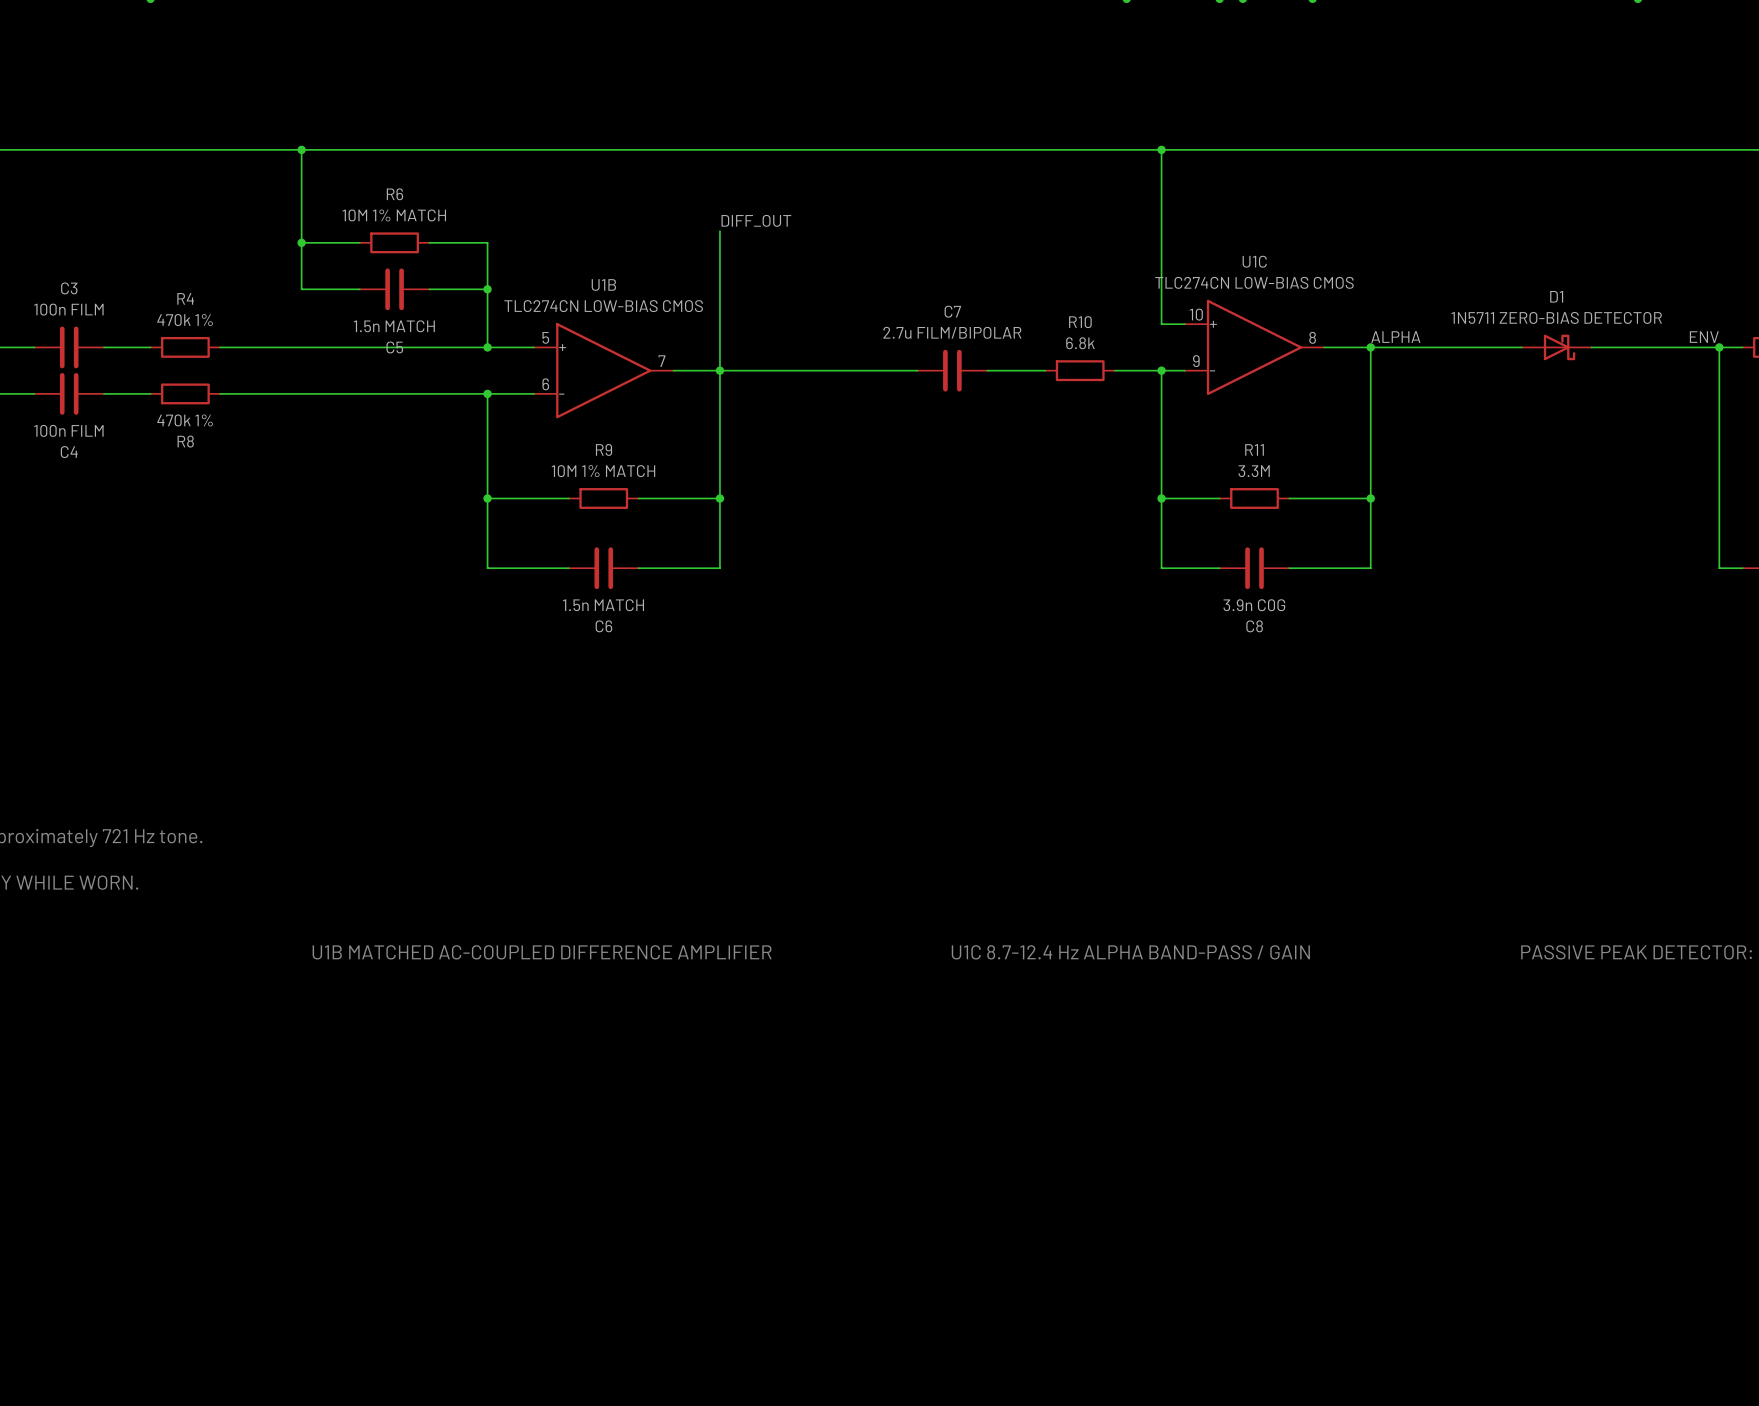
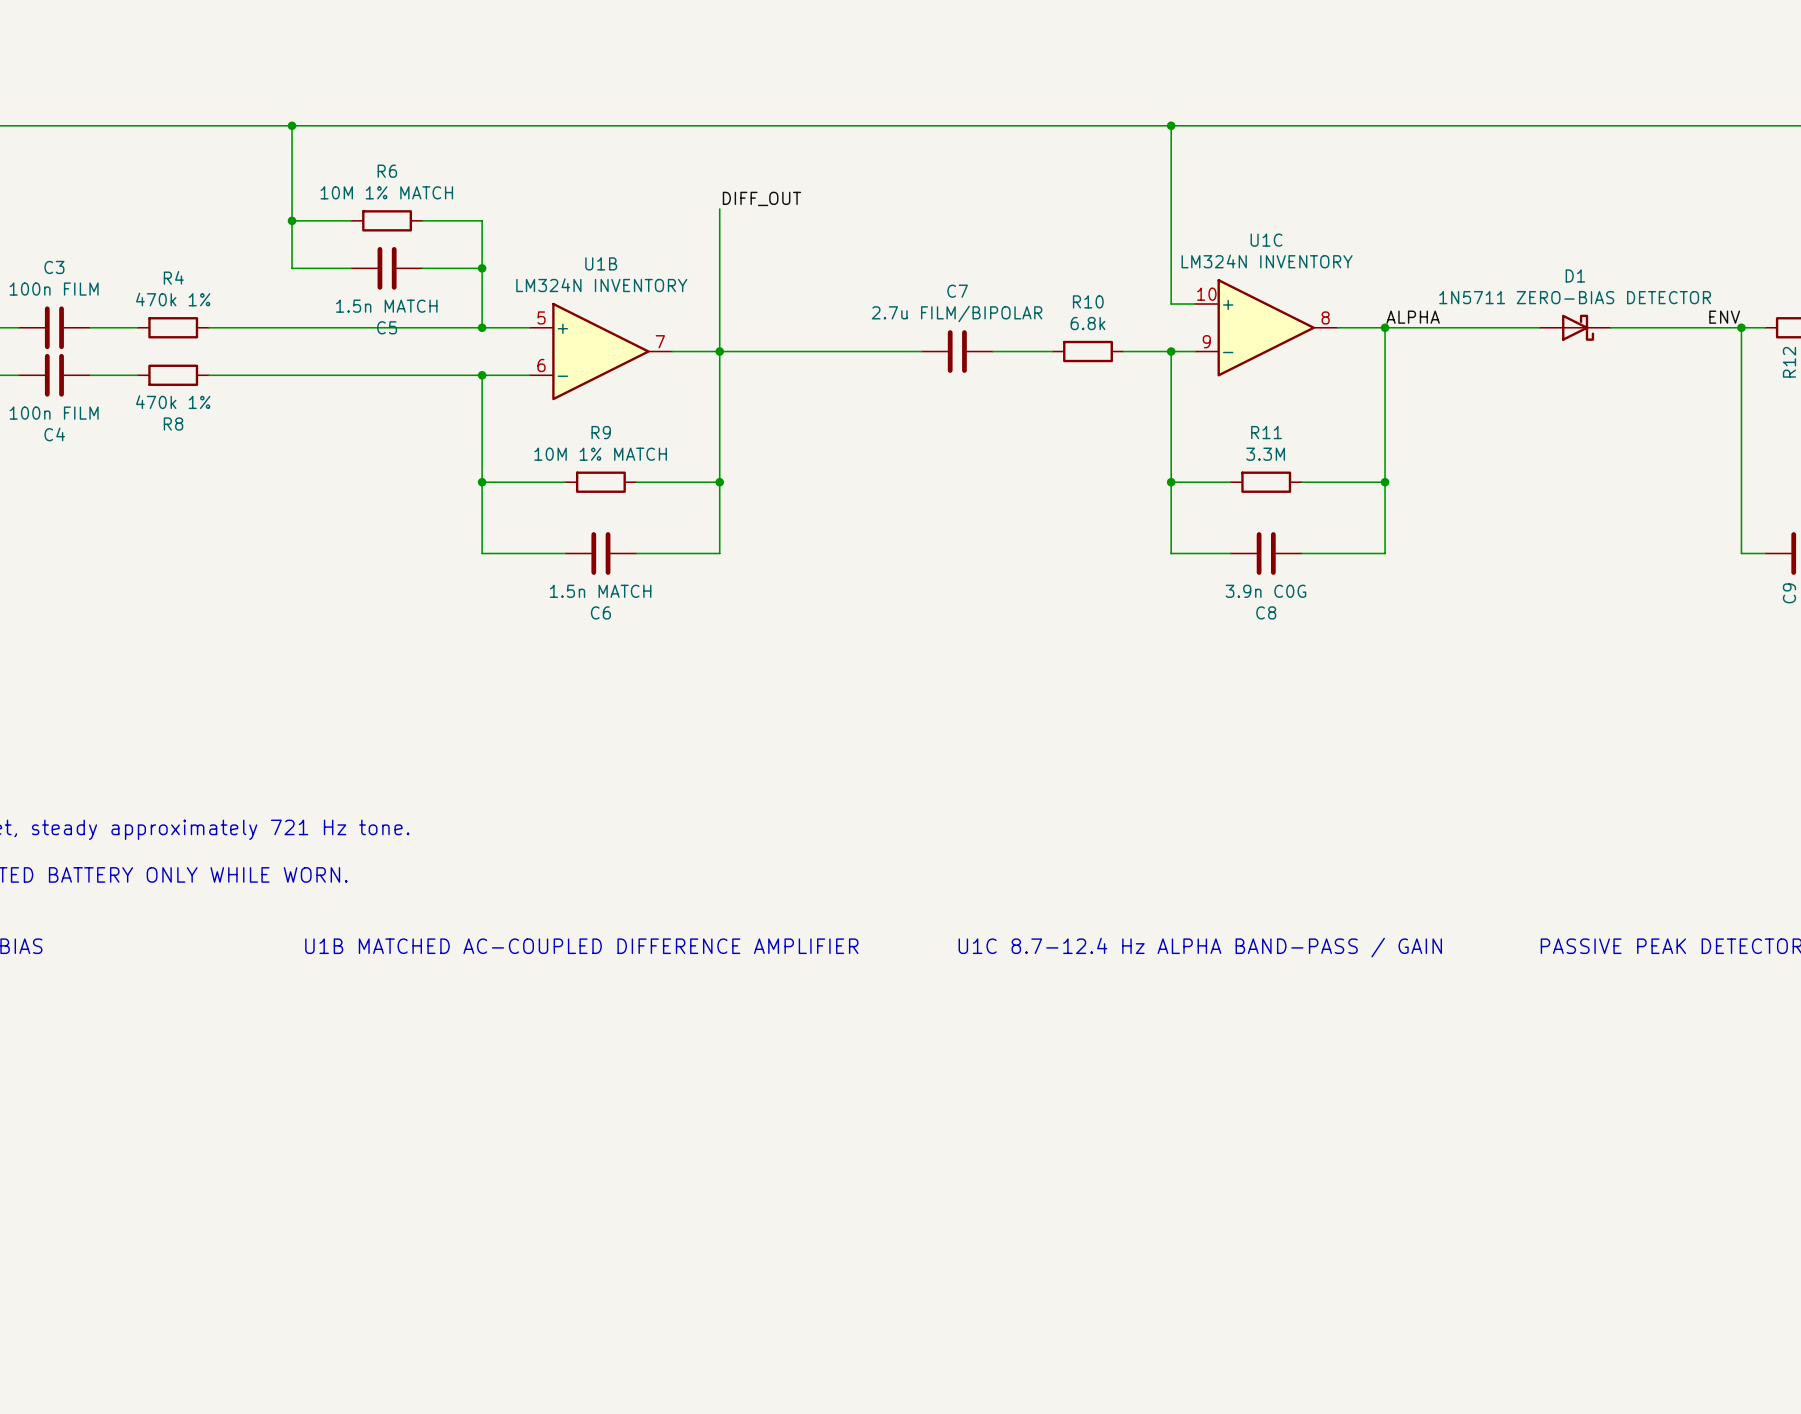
U1C value: TLC274CN LOW-BIAS CMOS (1254, 282) -> LM324N INVENTORY (1267, 261)
U1B value: TLC274CN LOW-BIAS CMOS (603, 306) -> LM324N INVENTORY (601, 285)

